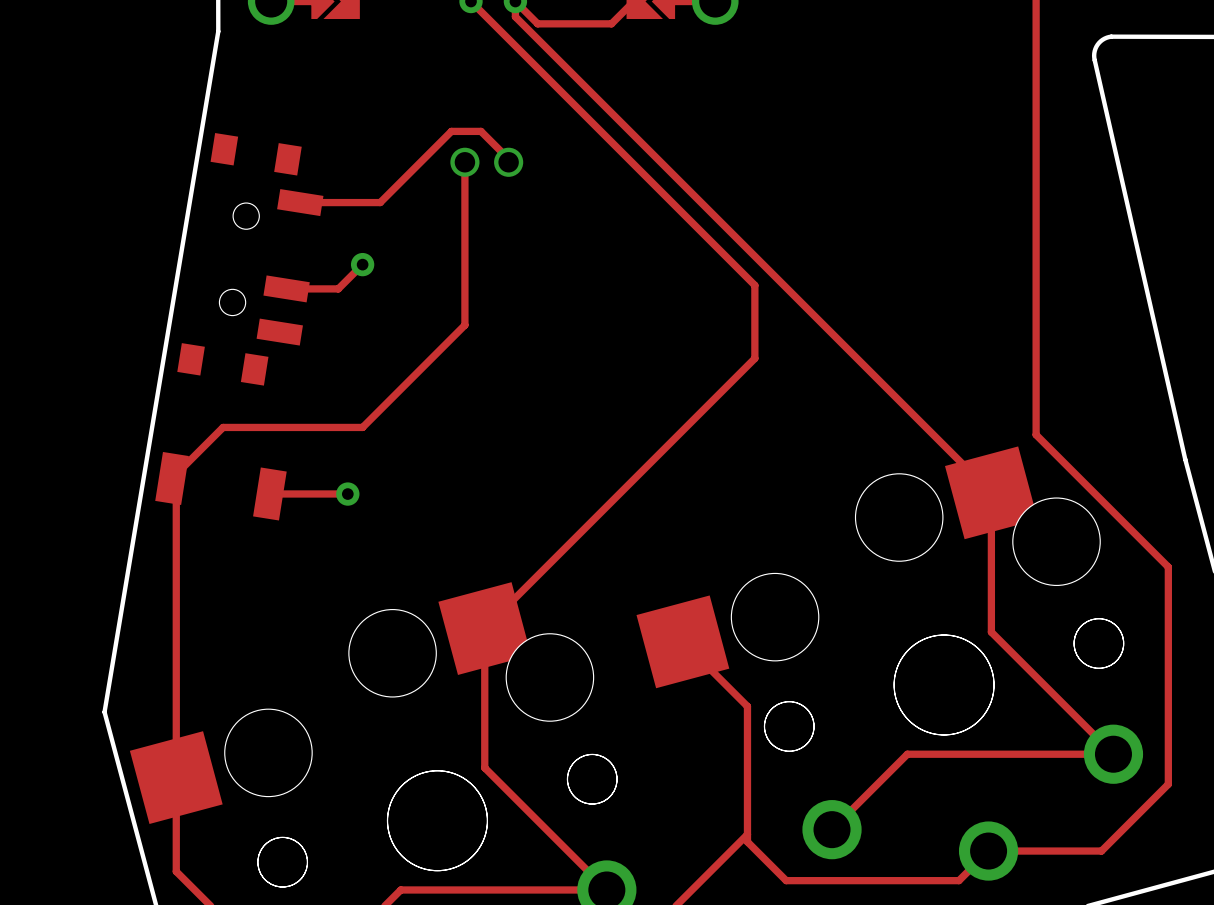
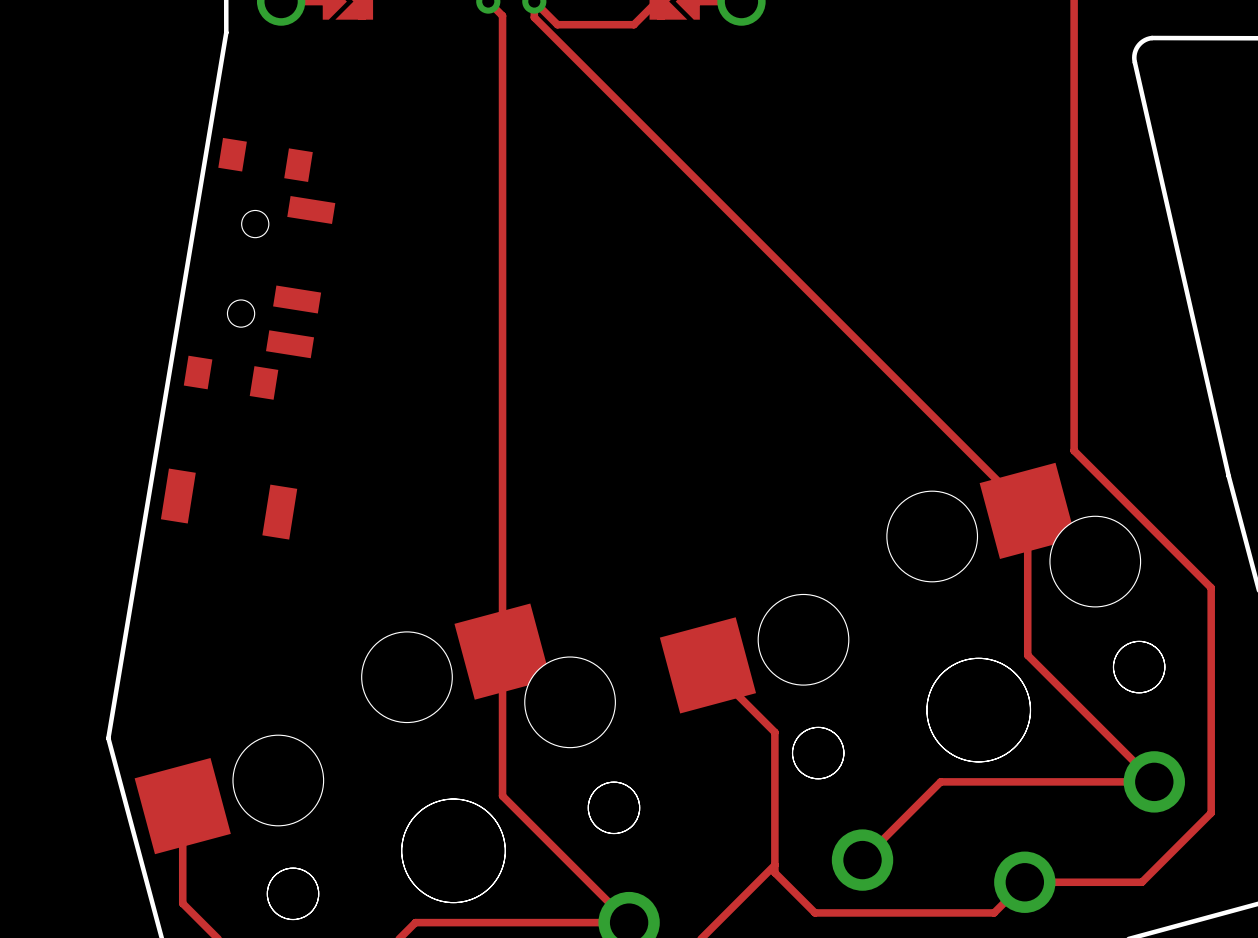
track: (484, 15) (754, 285) (754, 358) (484, 628) -> (502, 15) (502, 651)
track: (464, 162) (464, 325) (362, 427) (223, 427) (172, 478) (176, 482) (176, 777) -> none
part: (486, 162) -> none
track: (508, 162) (508, 159) (481, 131) (451, 131) (380, 202) (300, 202) -> none
track: (362, 264) (338, 288) (286, 288) -> none
via: (362, 264) -> none
track: (269, 493) (347, 493) -> none
via: (347, 494) -> none

